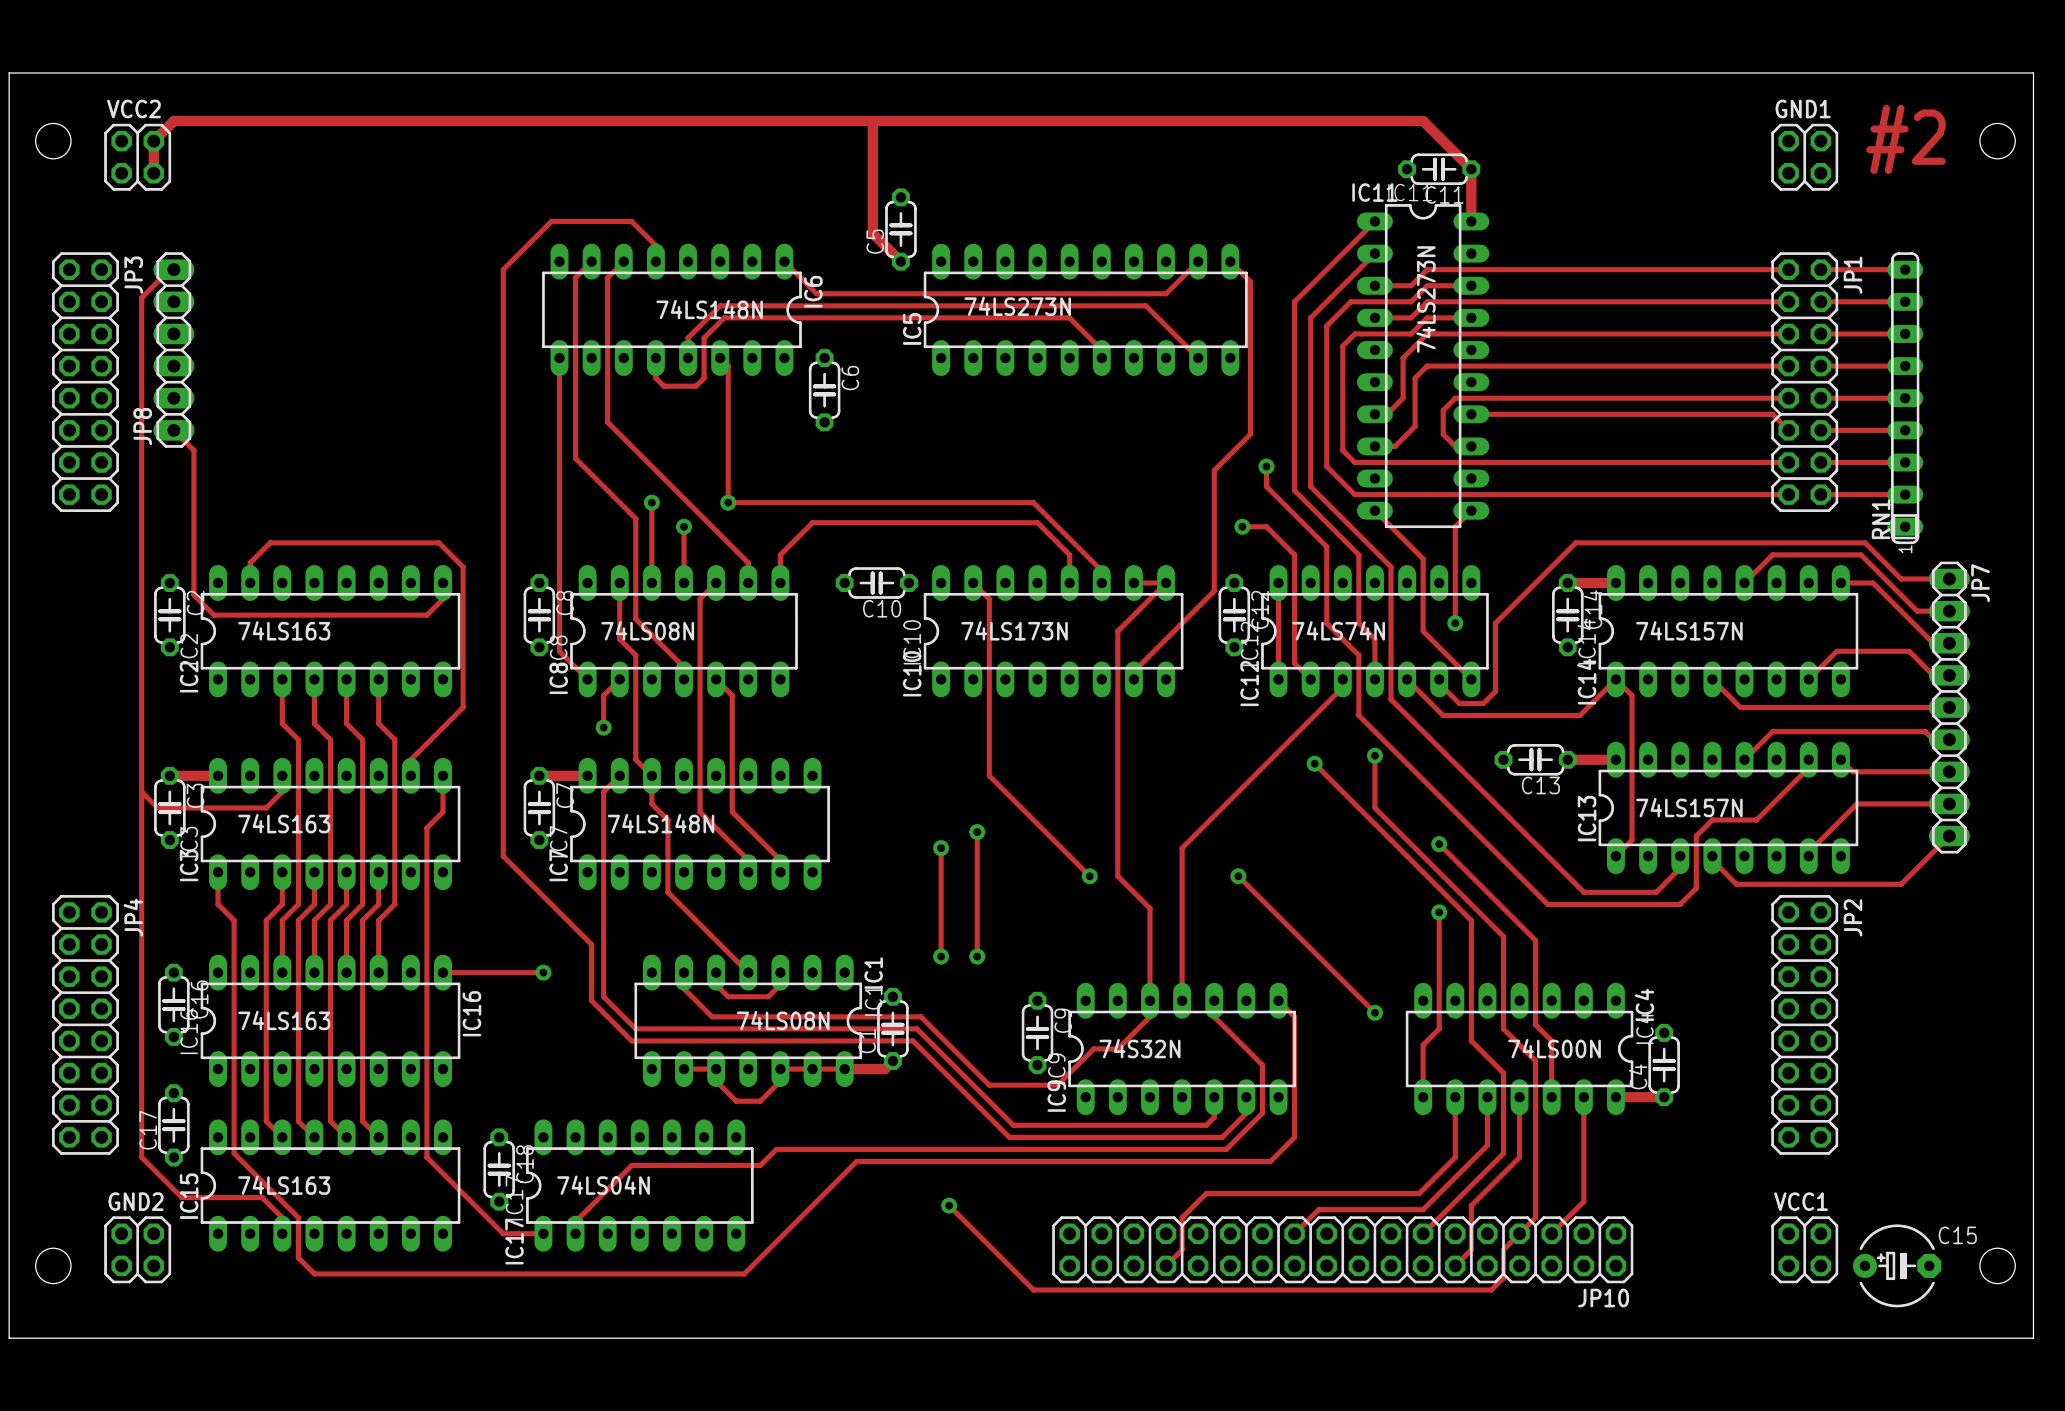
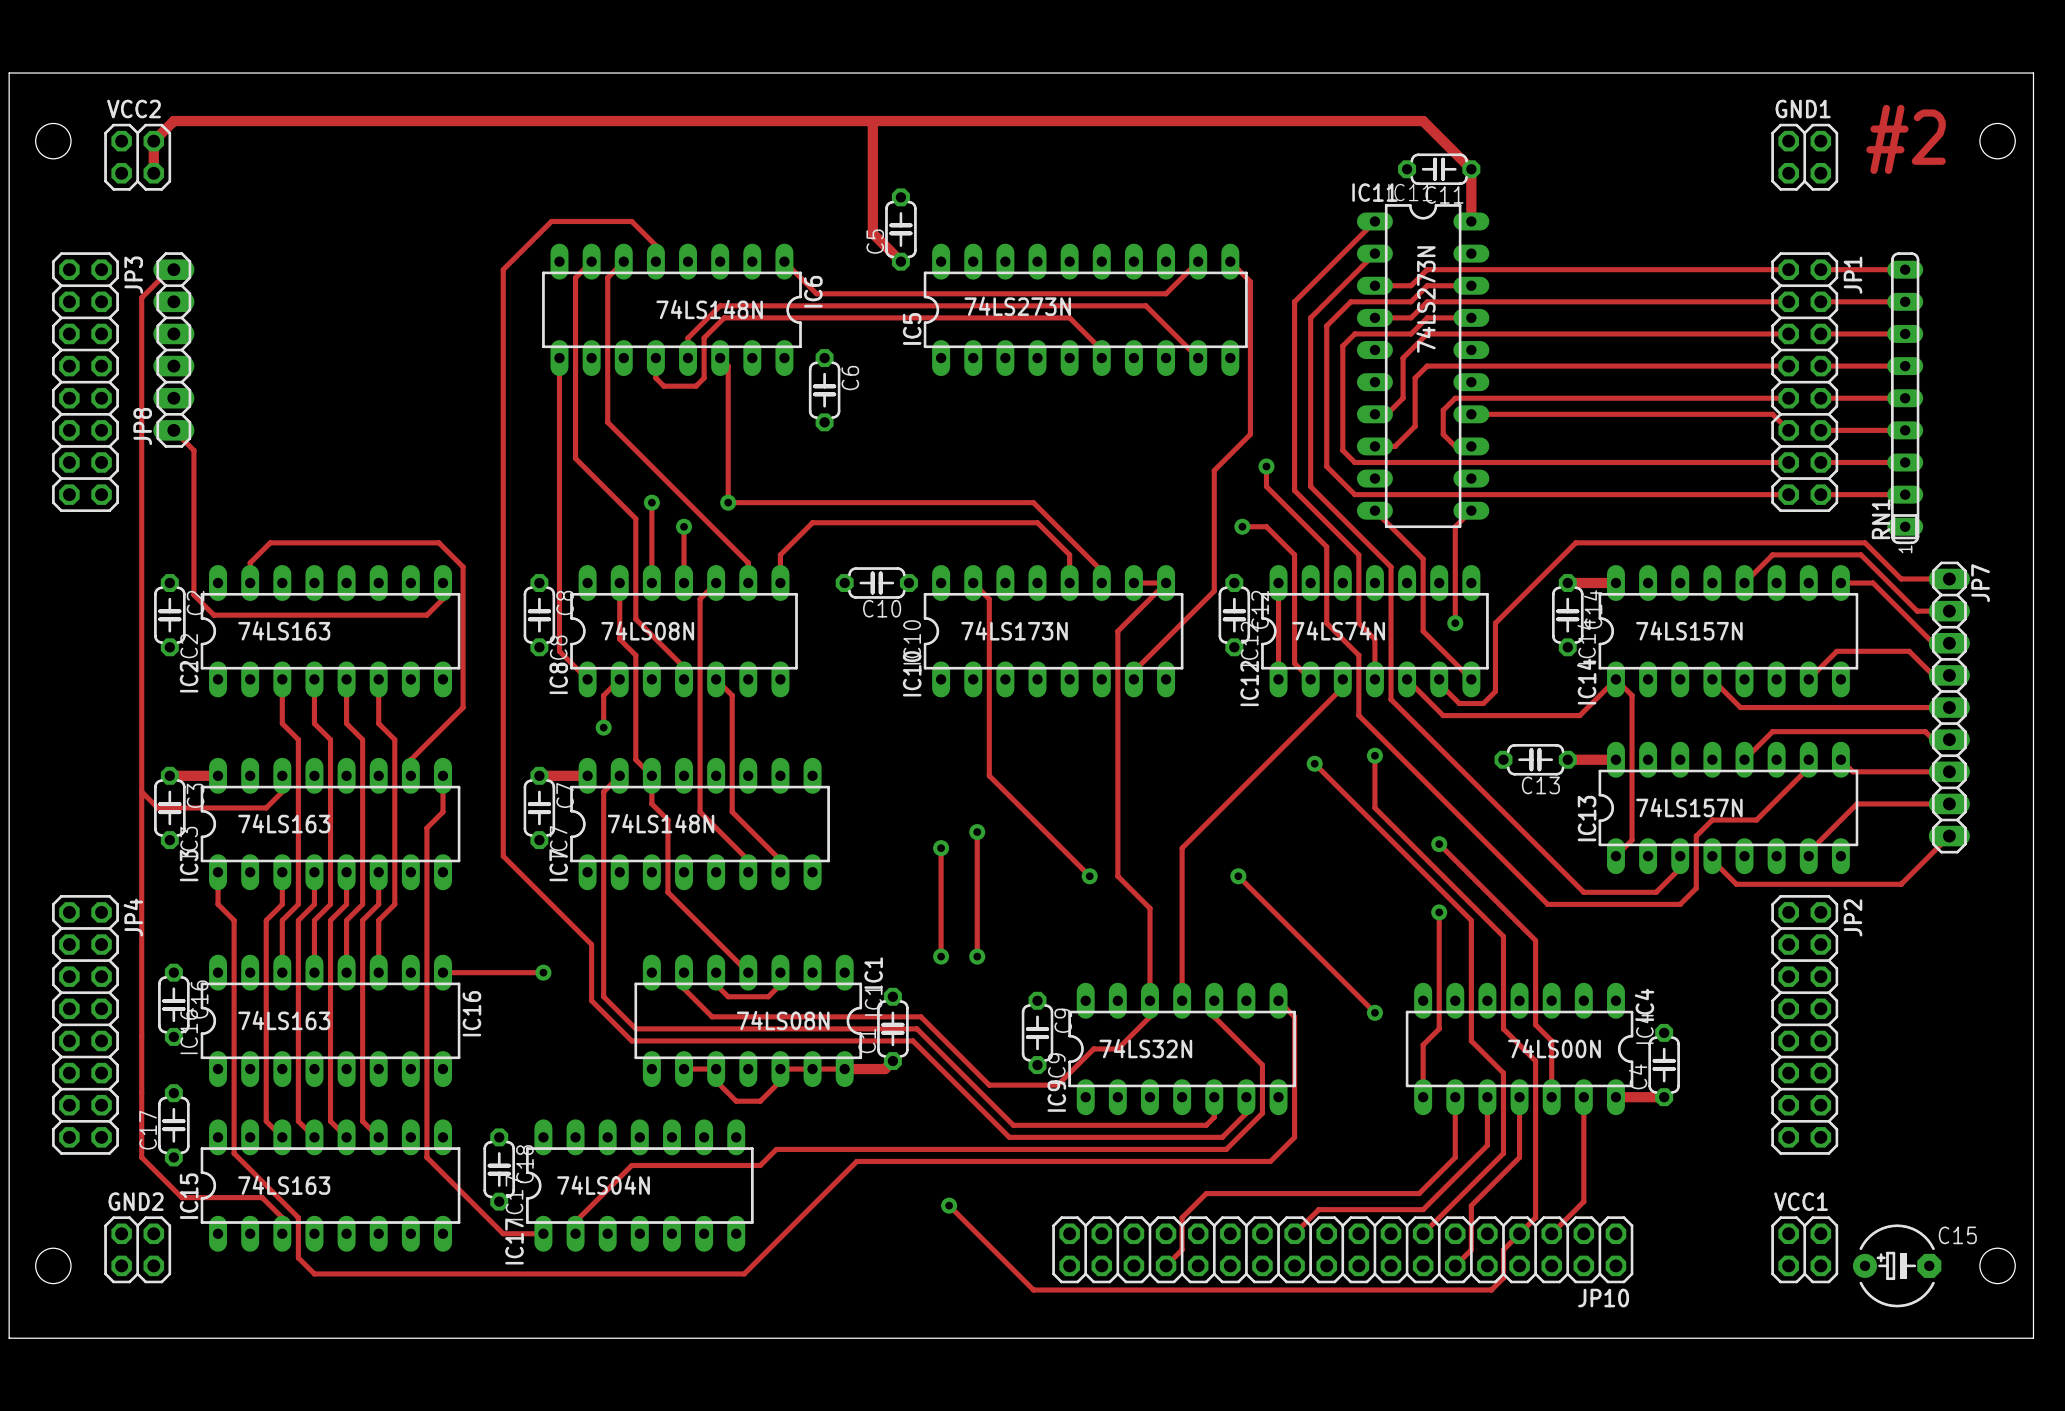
text: 74S32N (1139, 1048) -> 74LS32N (1145, 1048)

